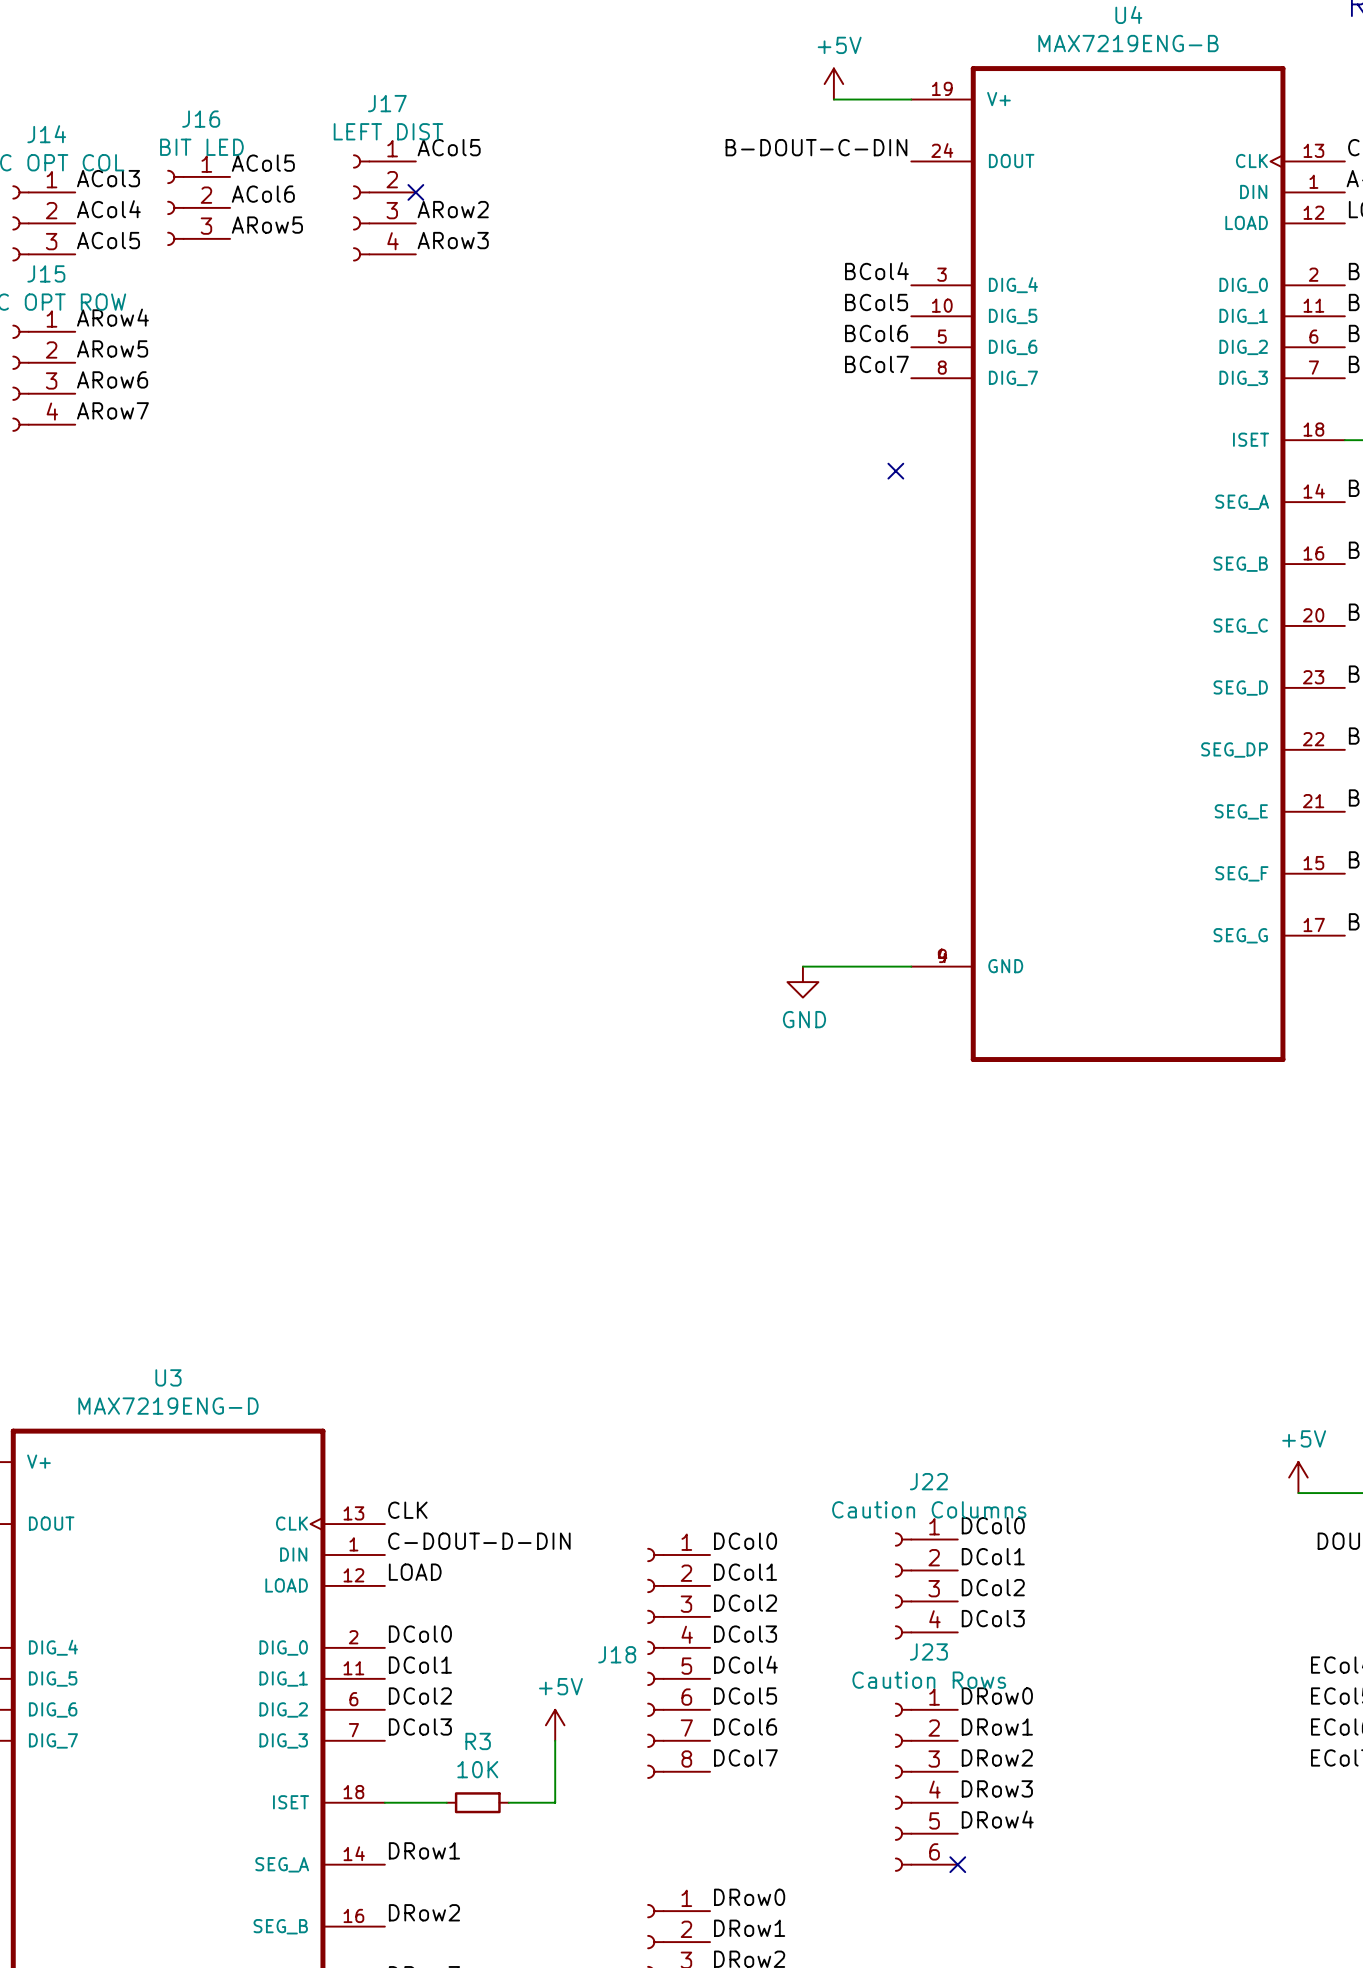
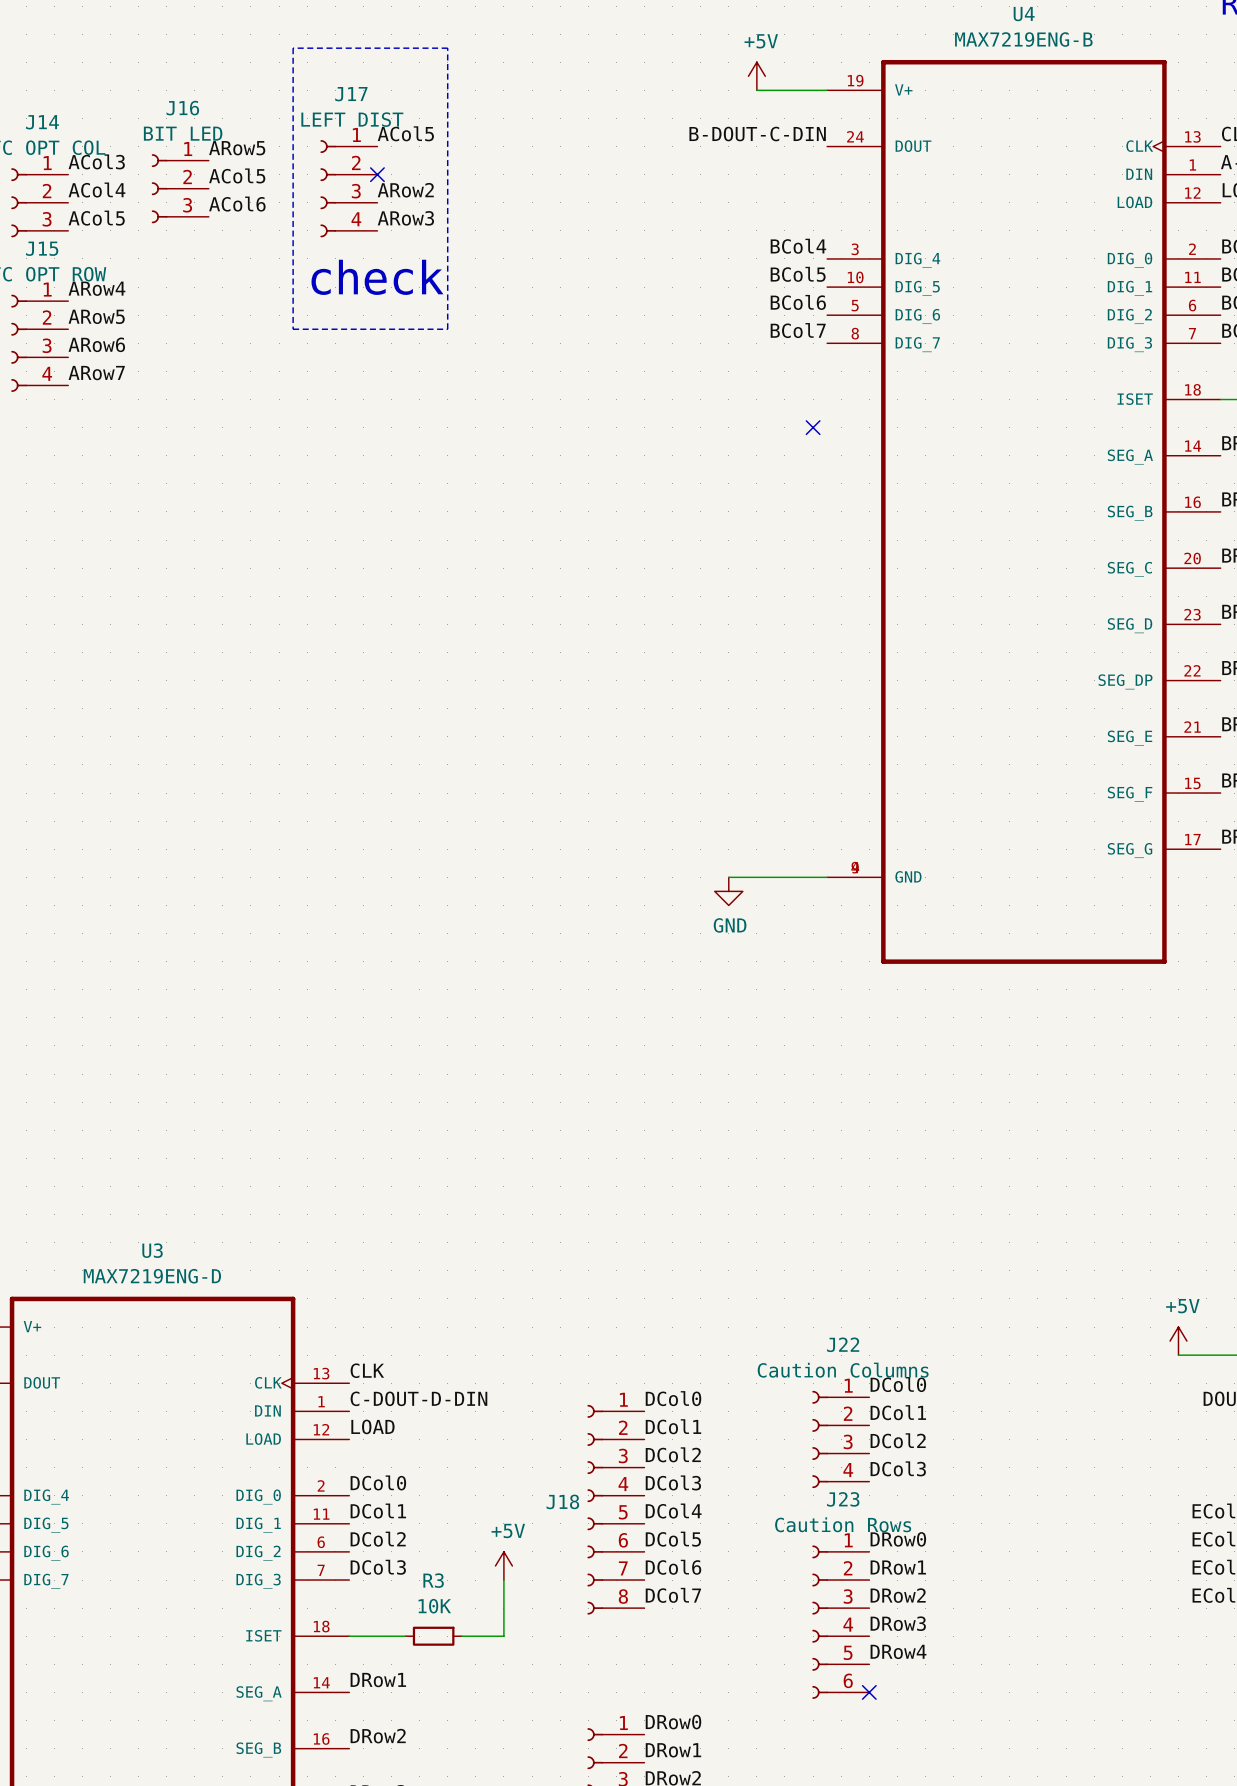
line: none -> (293, 48) (293, 329) (447, 329) (447, 48) (293, 48)
label: ACol5 (263, 163) -> ARow5 (237, 148)
label: ACol6 (263, 194) -> ACol5 (237, 175)
label: ARow5 (267, 225) -> ACol6 (237, 204)
text: none -> check (377, 277)

